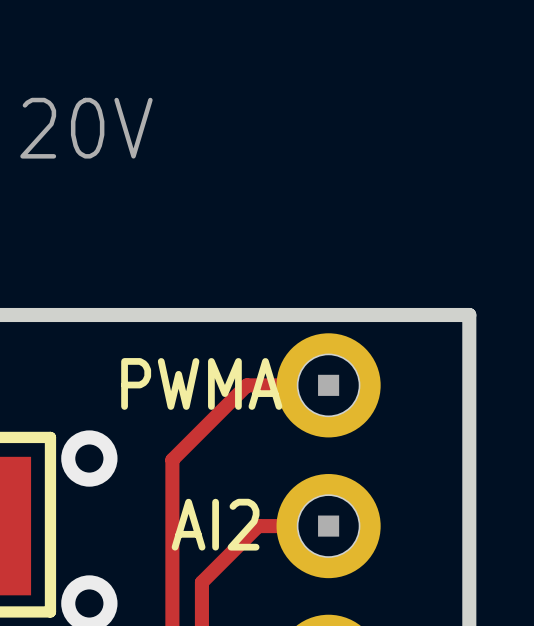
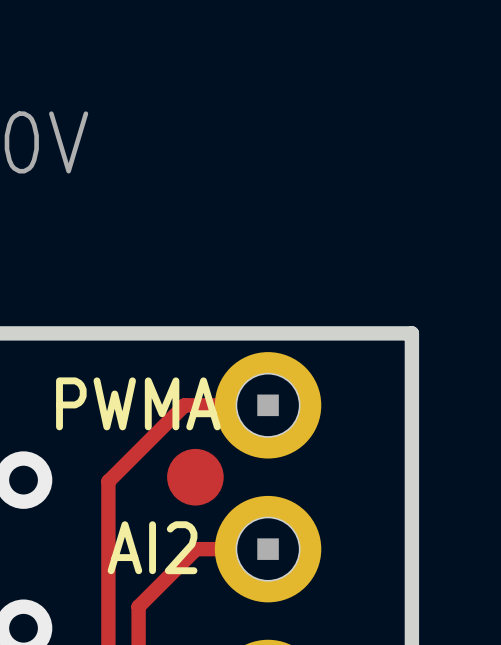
part: none -> (195, 477)

